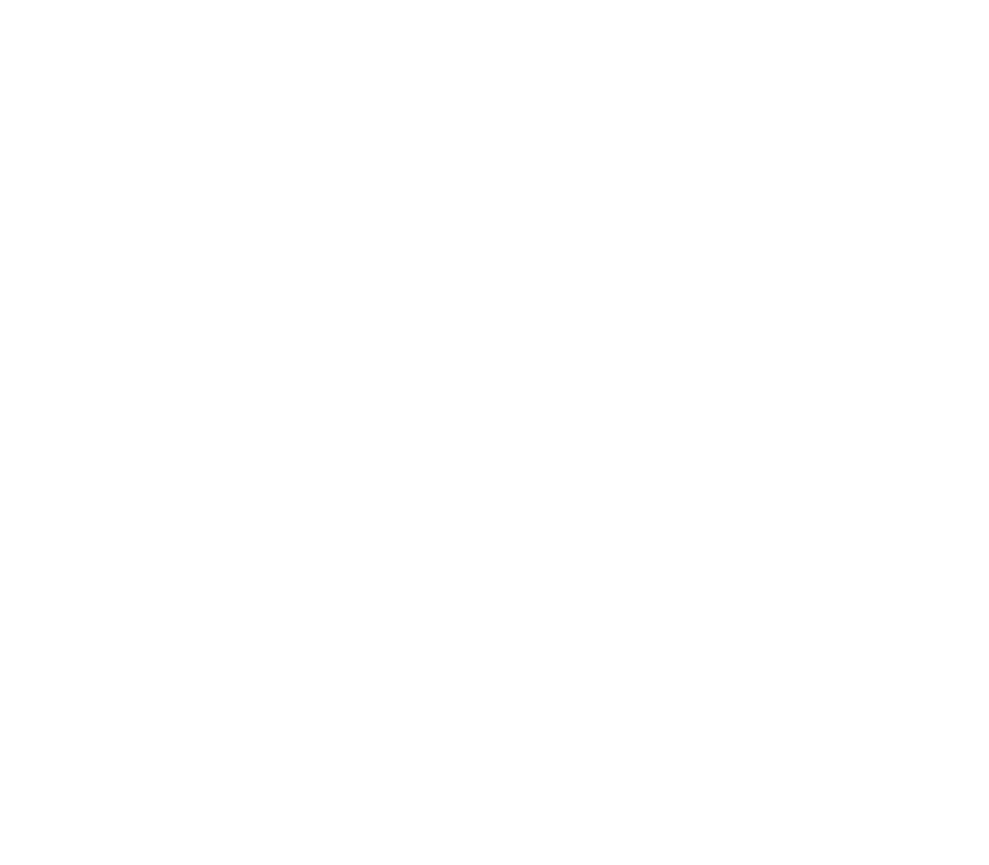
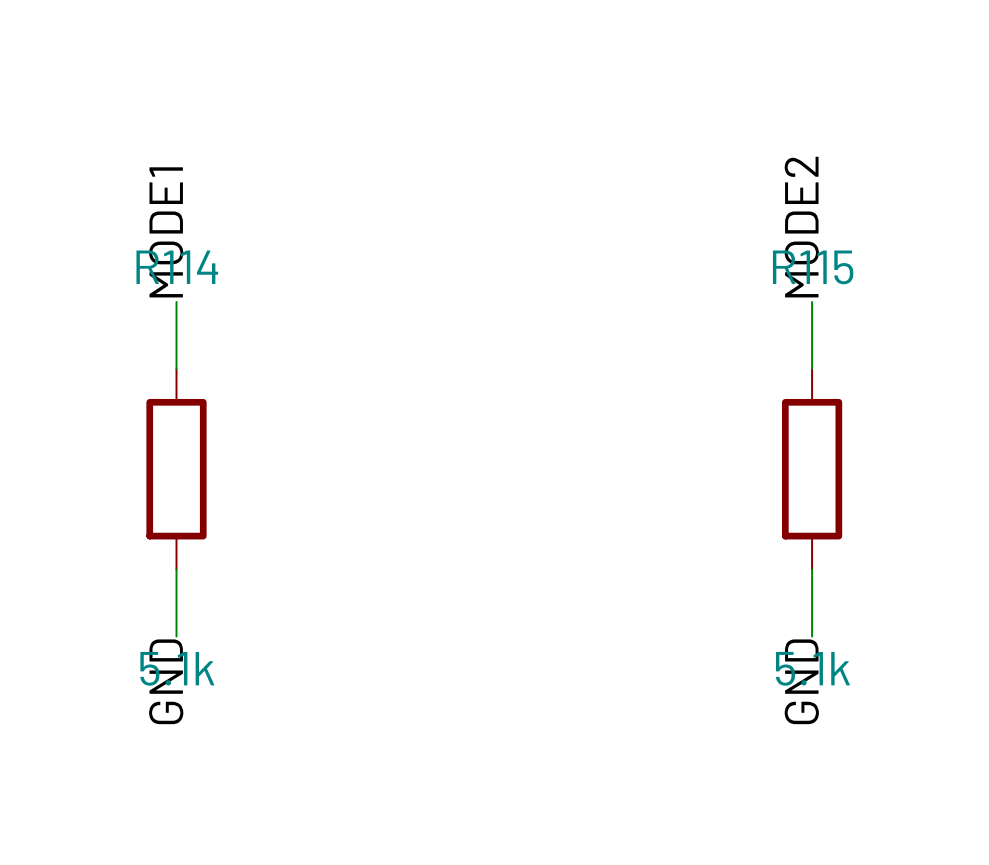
label: none -> MODE2 (801, 227)
label: none -> MODE1 (166, 232)
wire: none -> (176, 301) (176, 368)
wire: none -> (812, 301) (812, 368)
R114: none -> 5.1k (176, 469)
R115: none -> 5.1k (812, 469)
wire: none -> (176, 569) (176, 636)
wire: none -> (812, 569) (812, 636)
label: none -> GND (166, 681)
label: none -> GND (801, 681)

